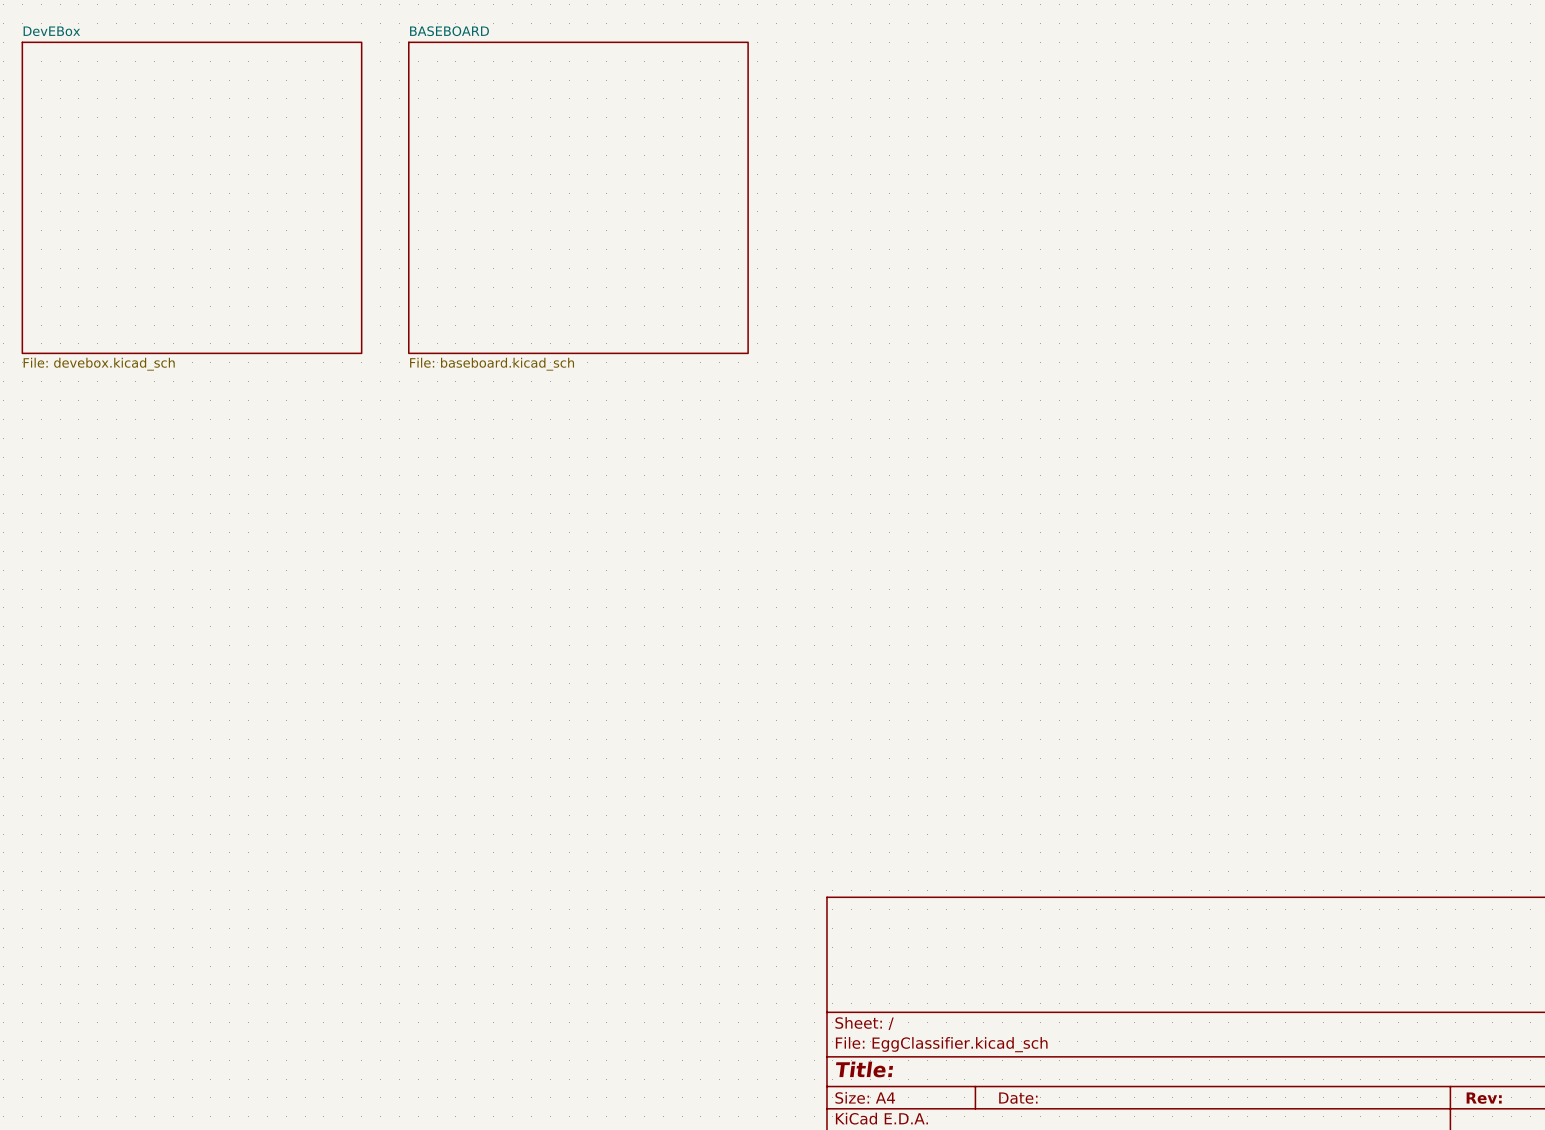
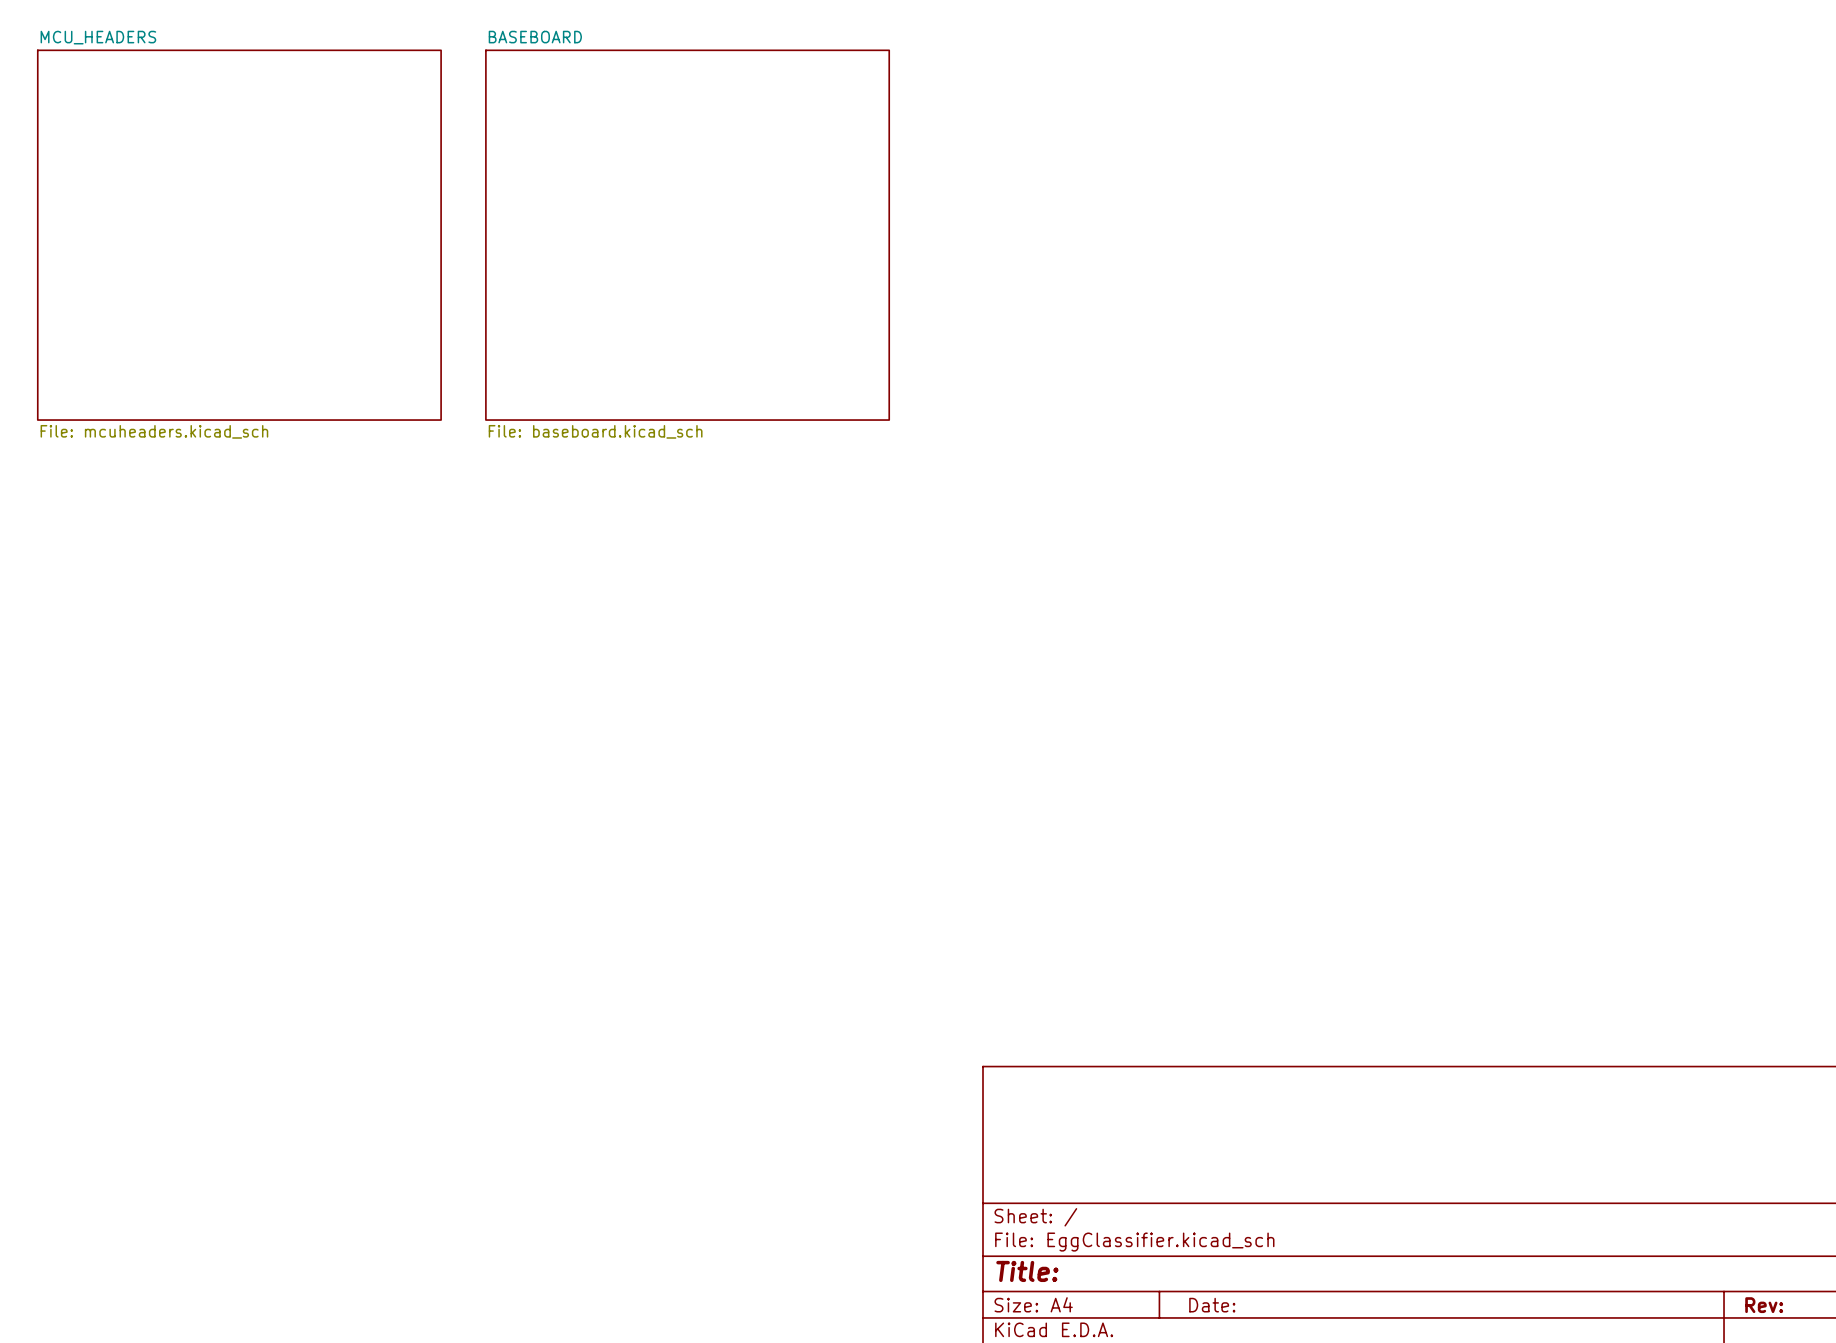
sheet DevEBox: File: devebox.kicad_sch (192, 197) -> none
sheet MCU_HEADERS: none -> File: mcuheaders.kicad_sch (239, 235)

